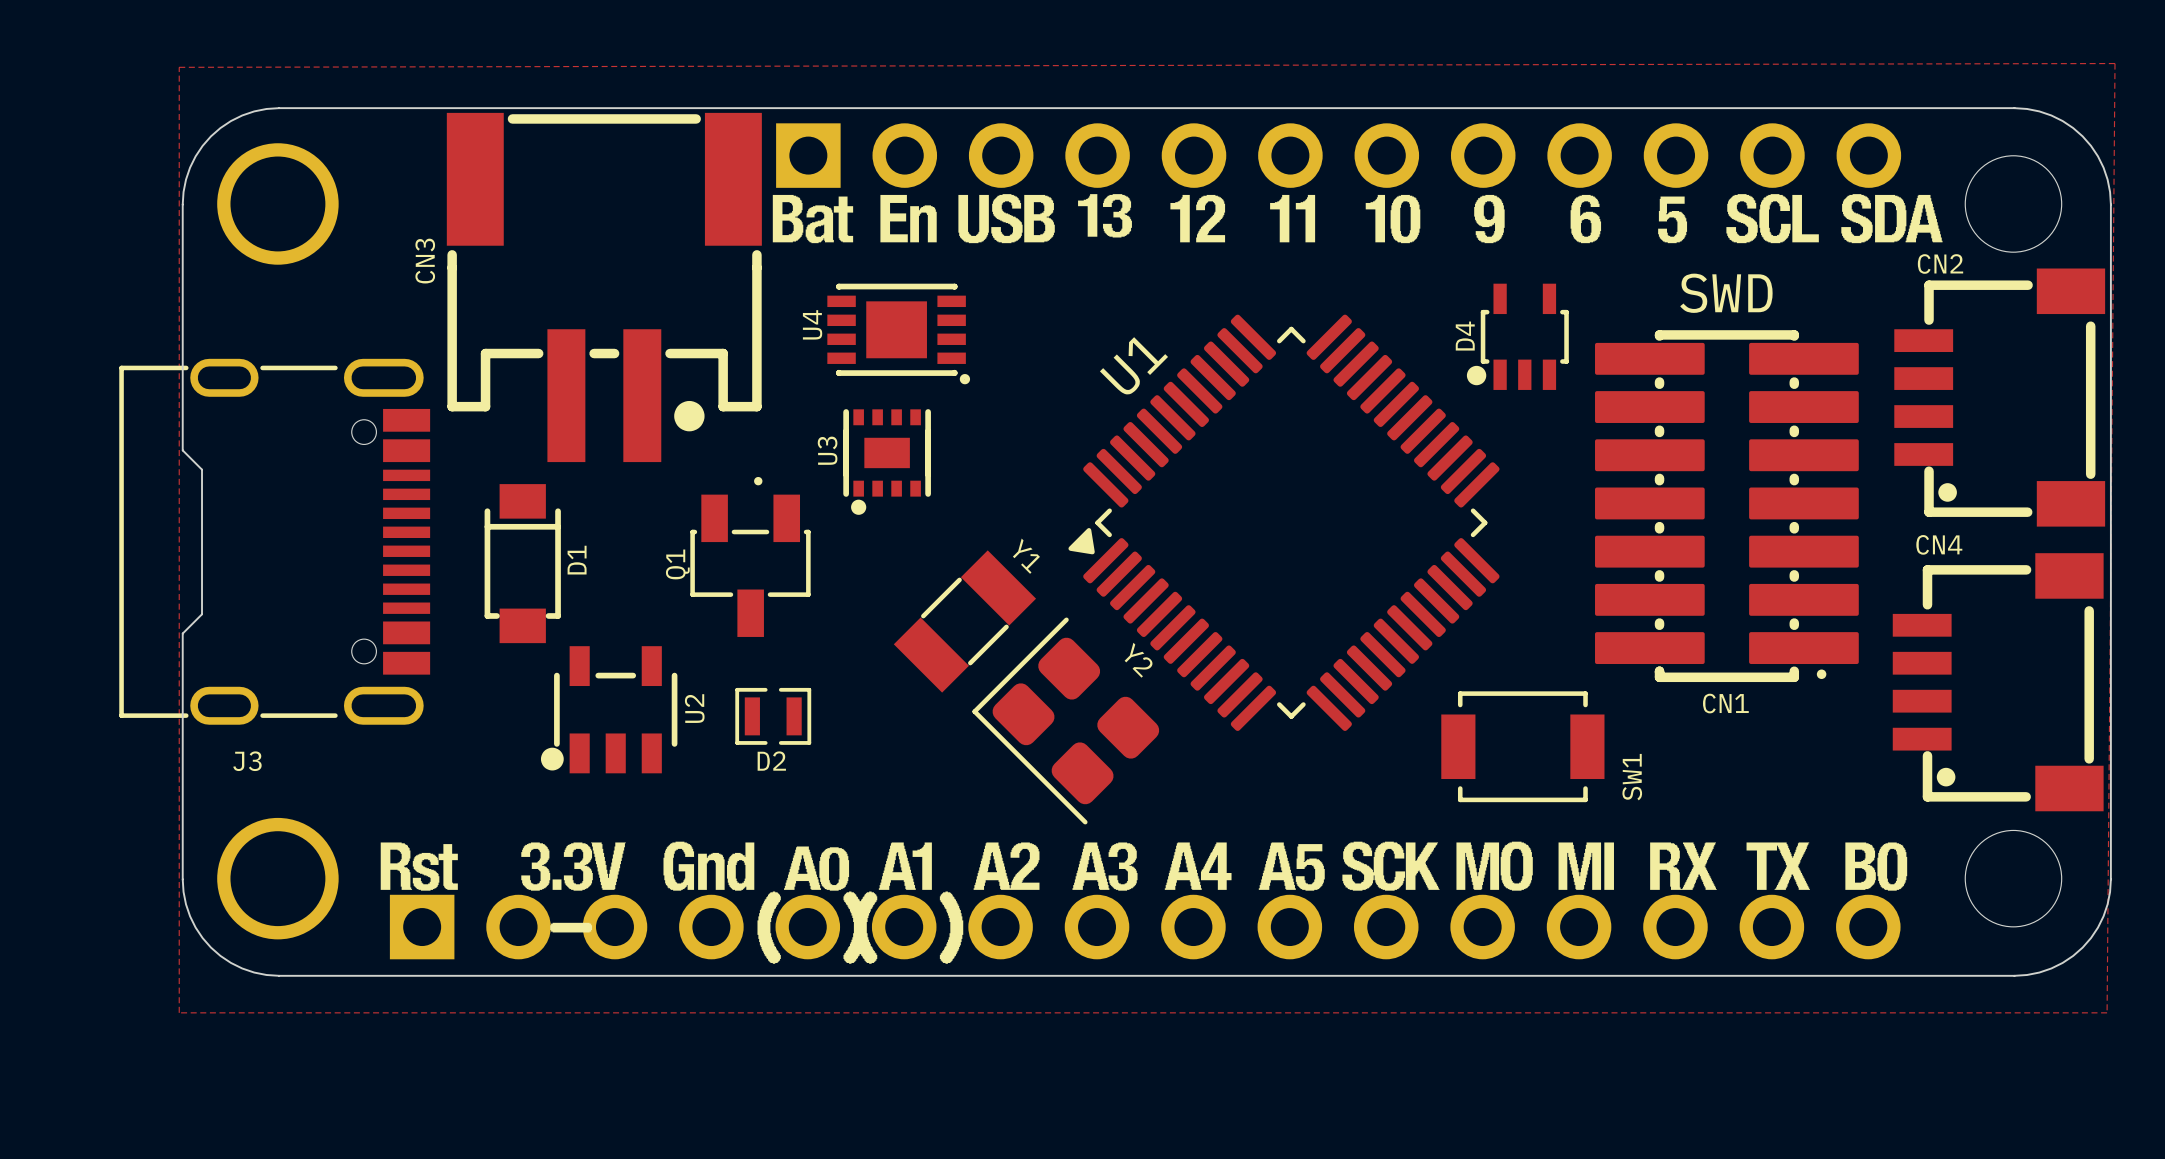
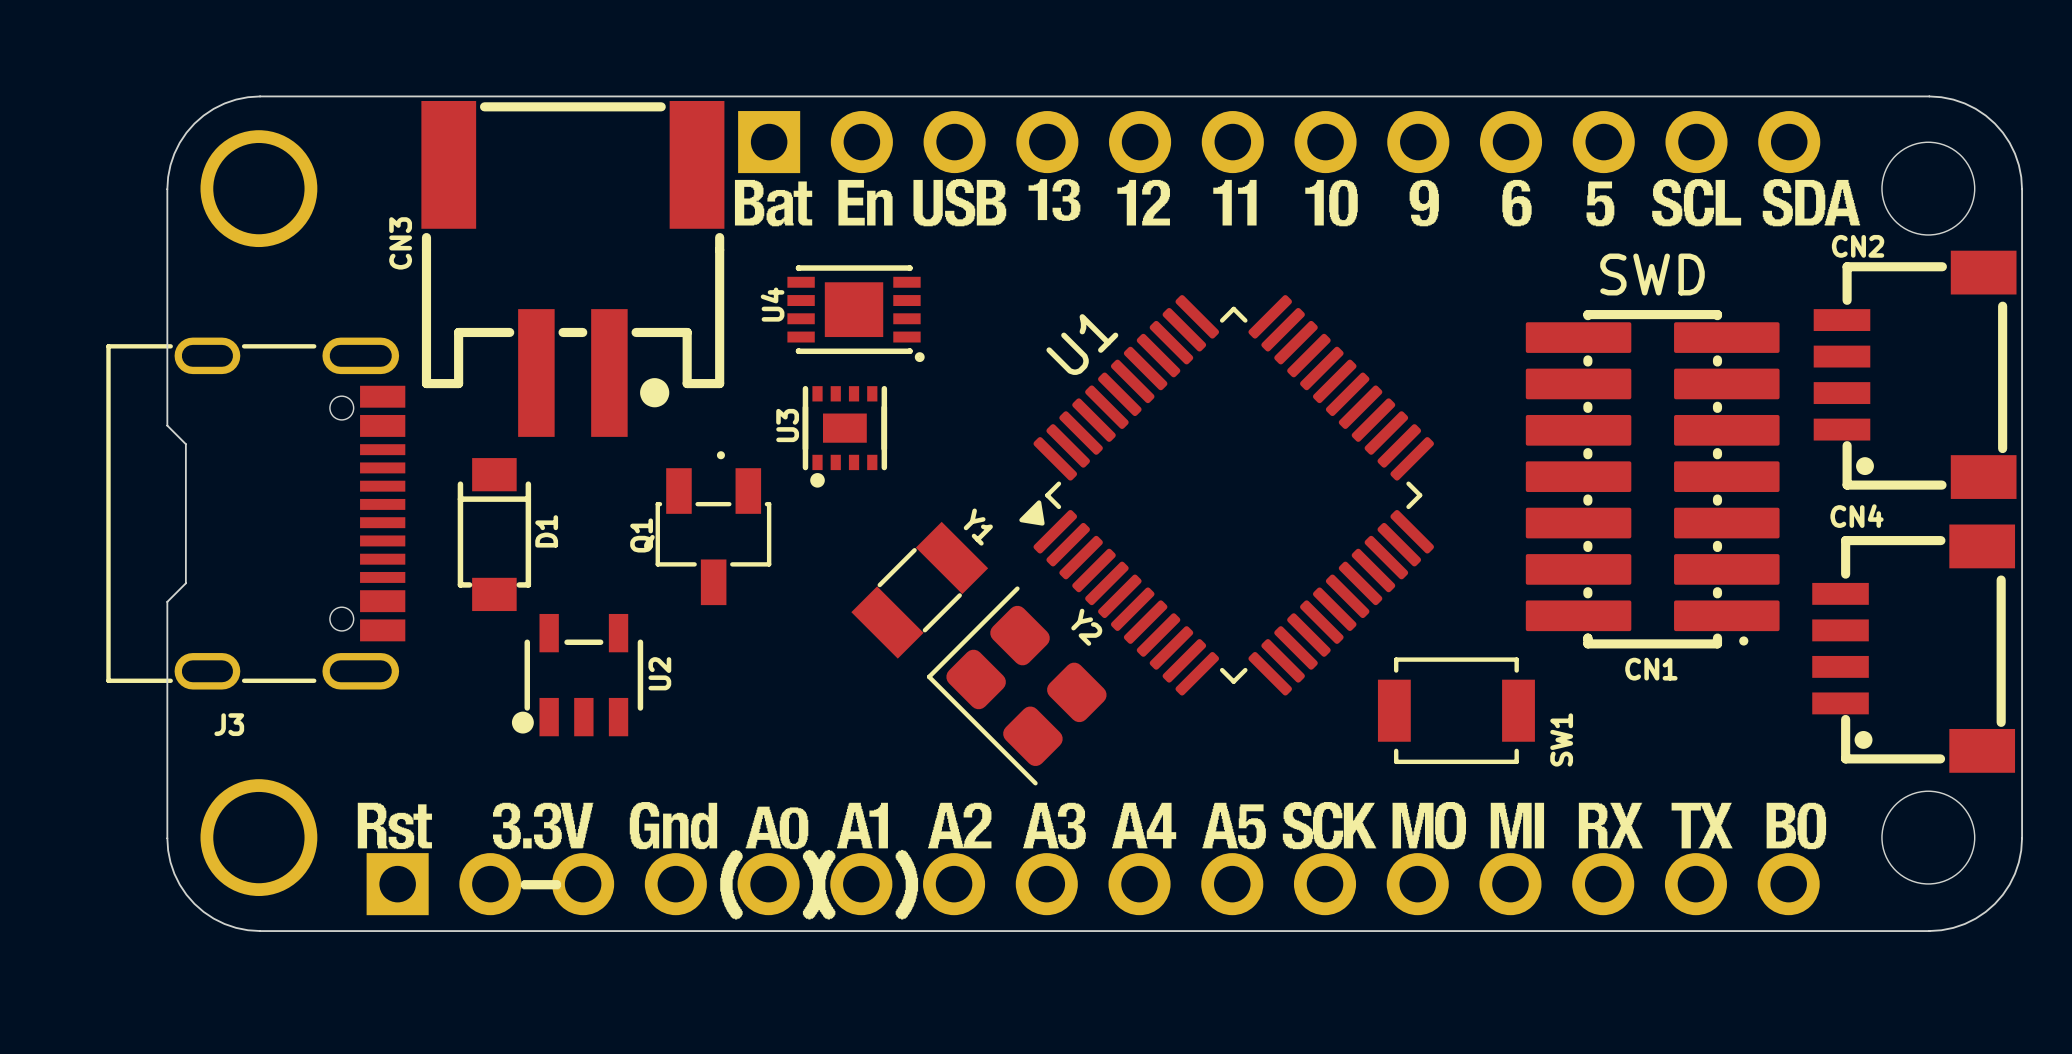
zone outline: (2115, 63) (2107, 1012) (179, 1012) (179, 67) (2115, 63) -> none
D4: (1517, 336) -> none
D2: (773, 716) -> none

